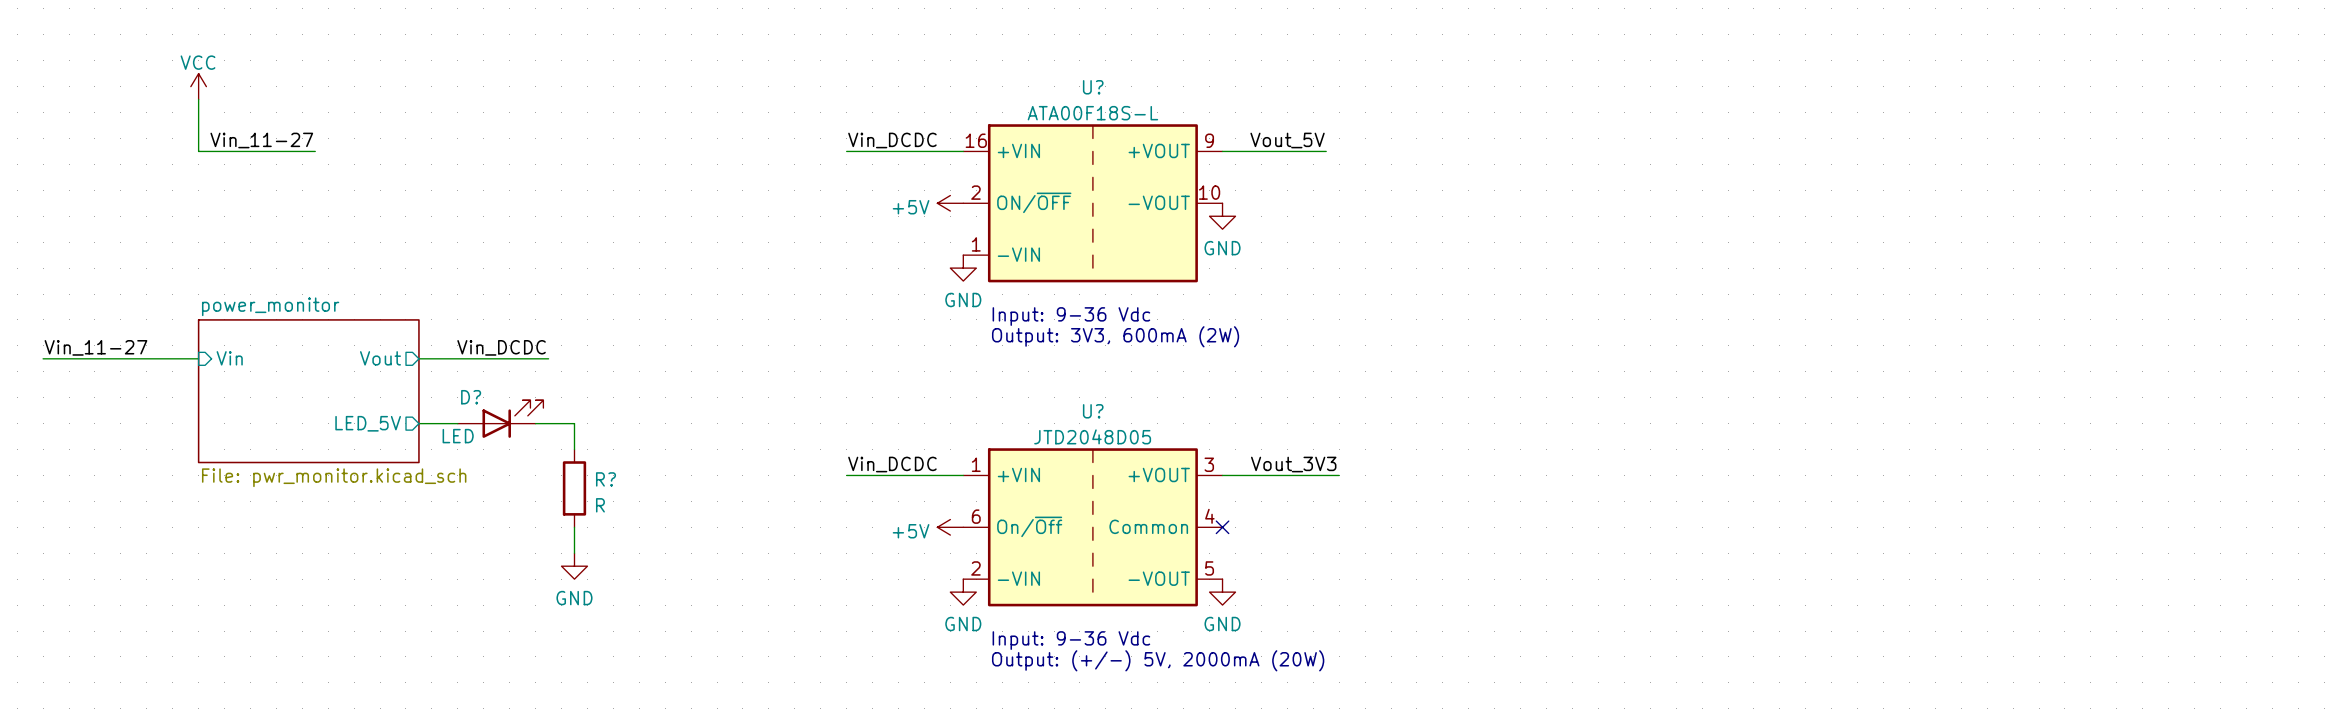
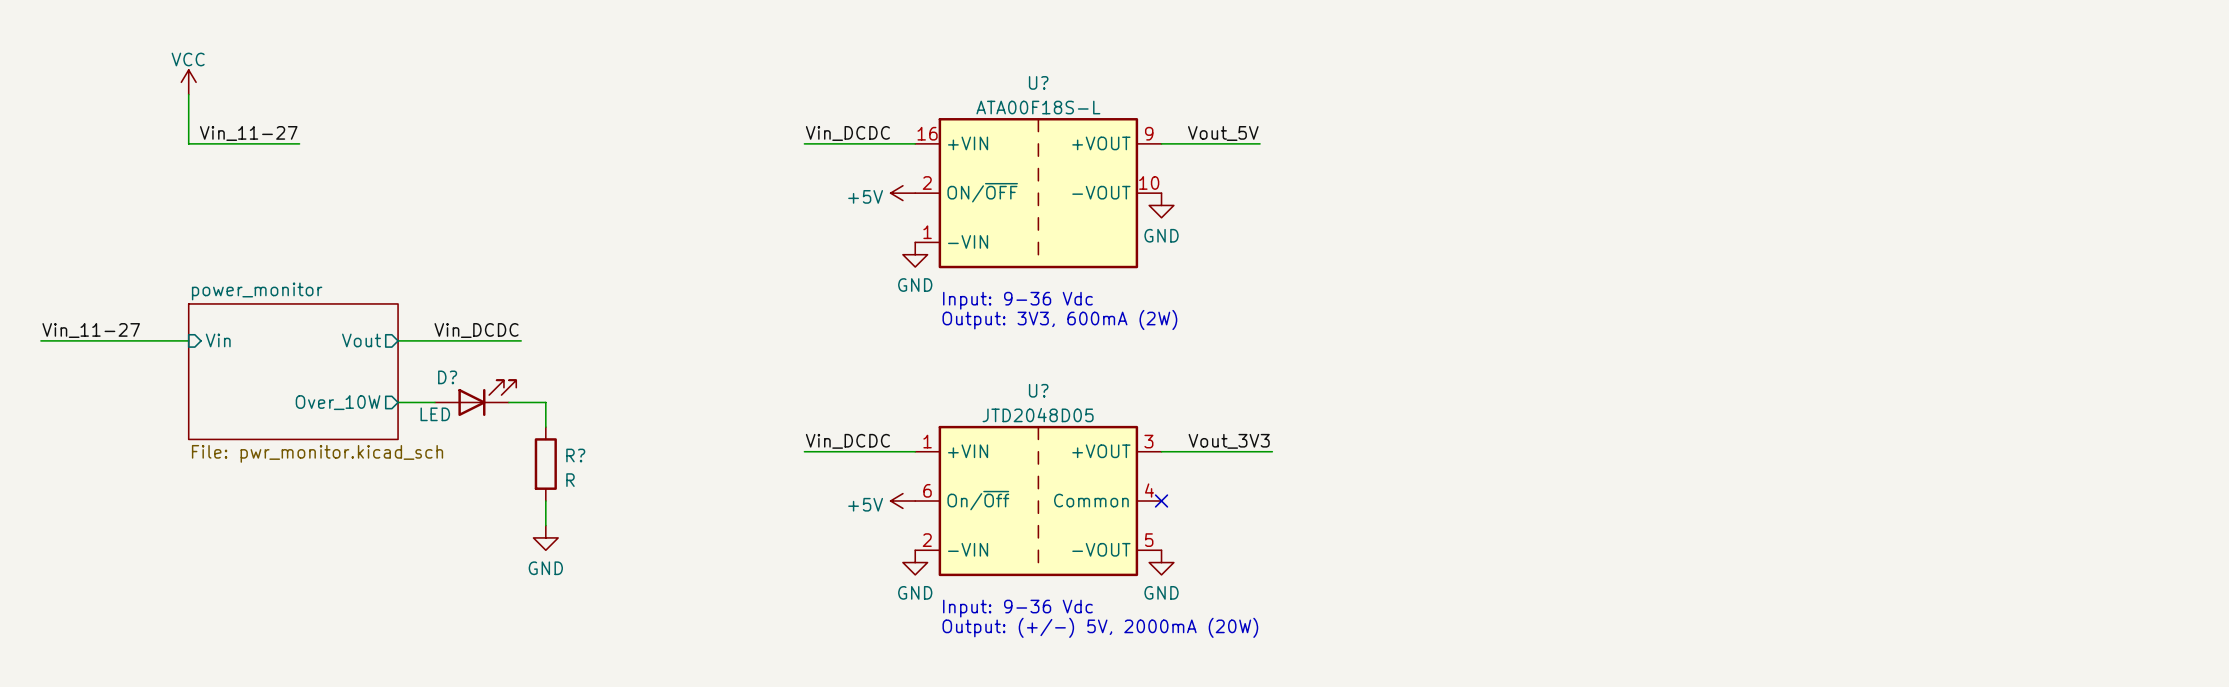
sheet pin: LED_5V (368, 423) -> Over_10W (338, 402)

